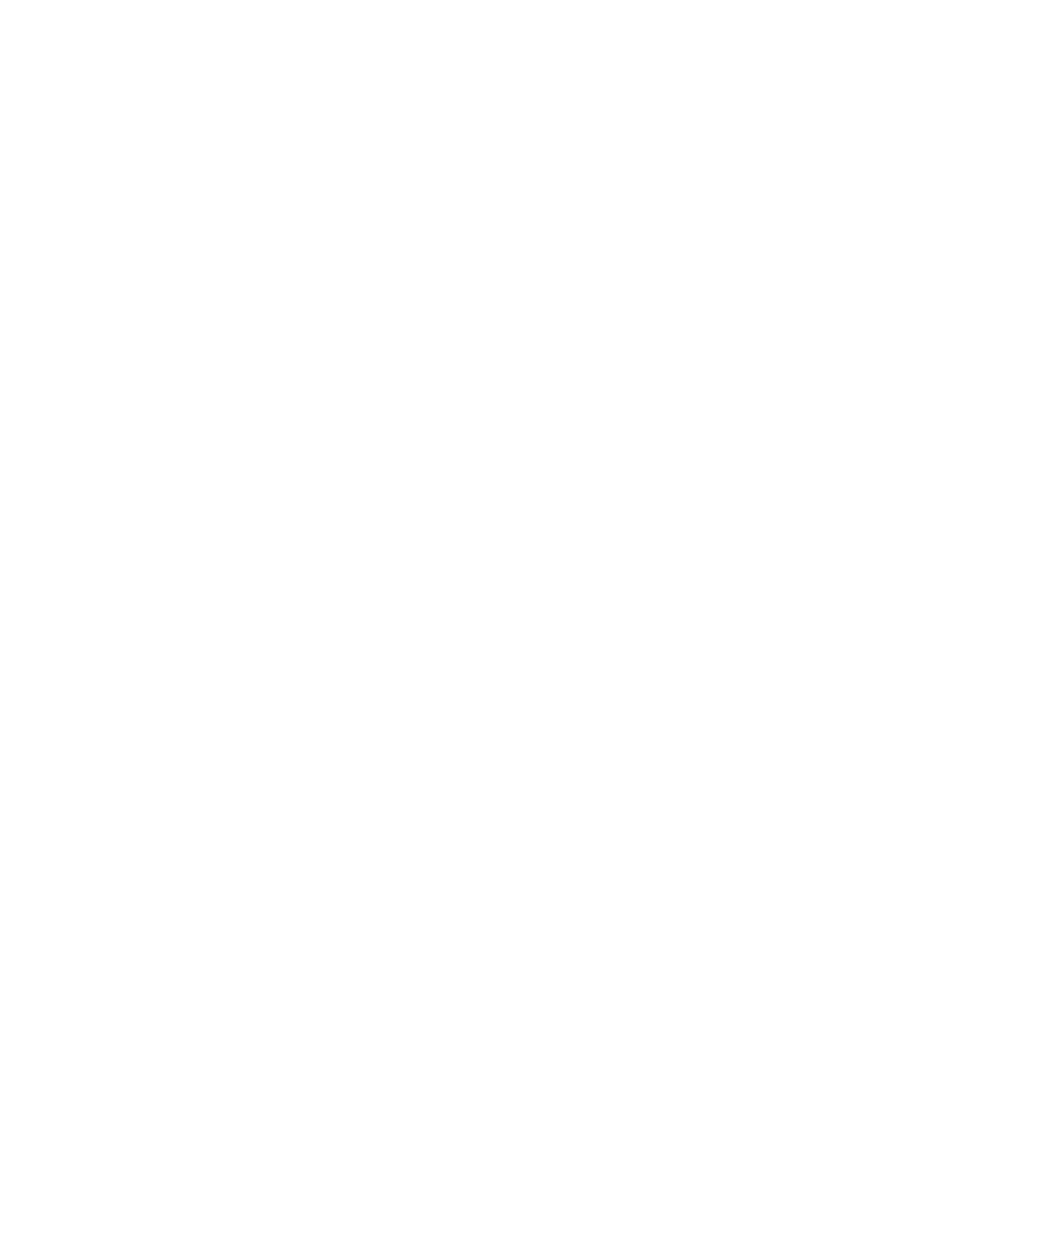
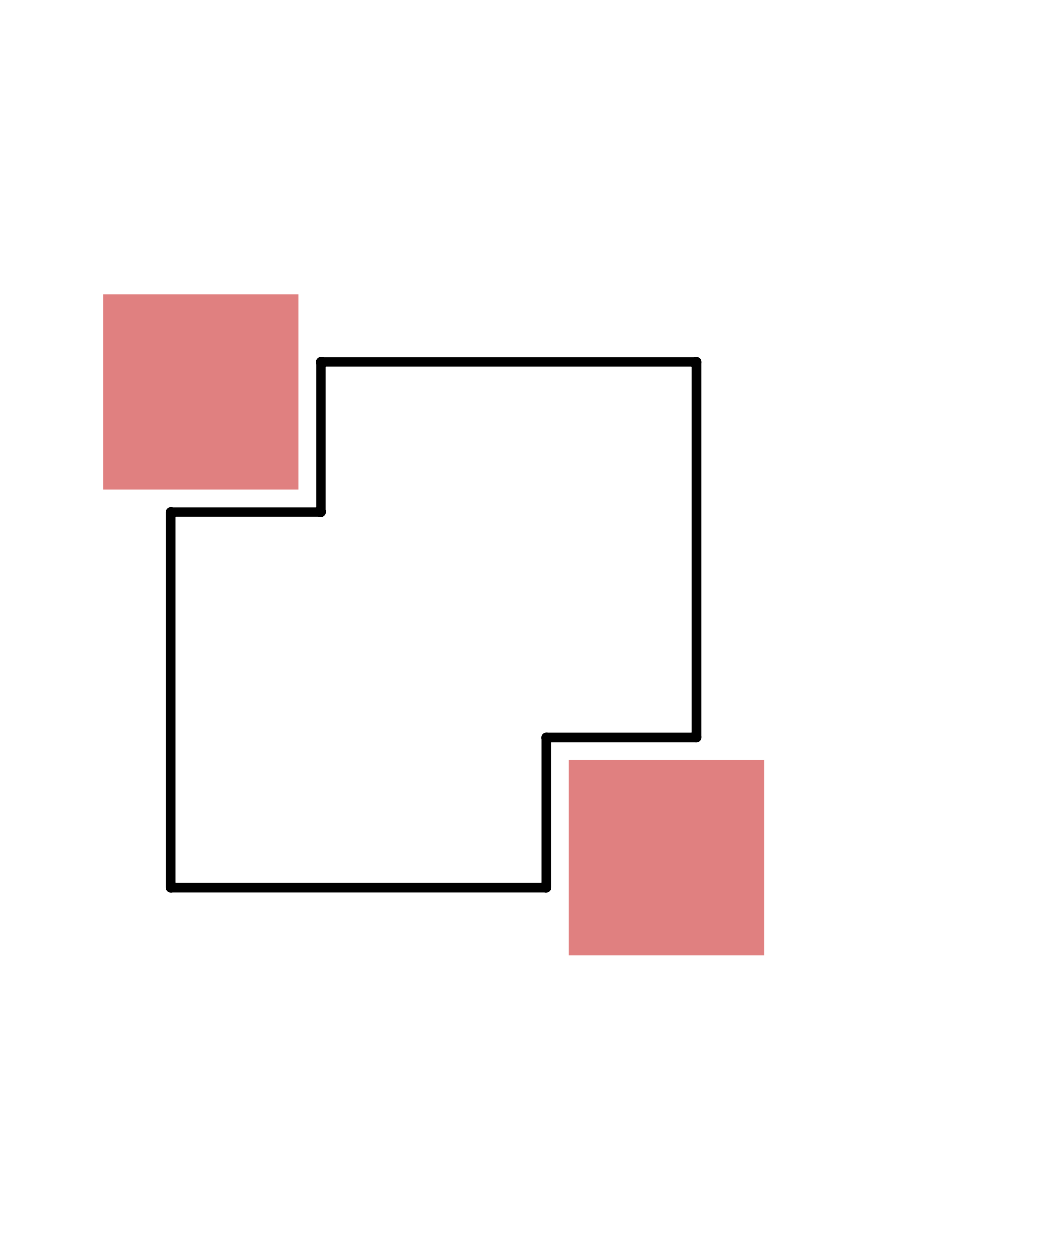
part: none -> (433, 624)

